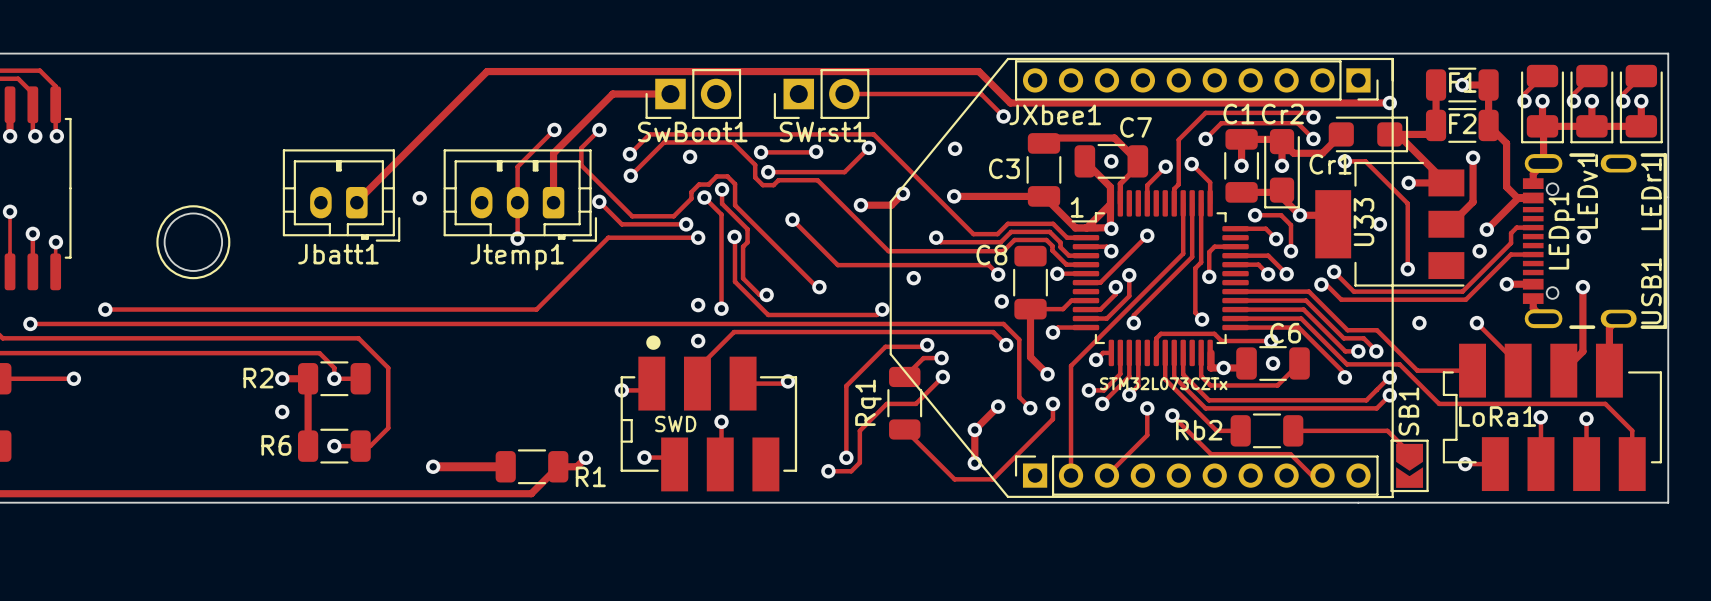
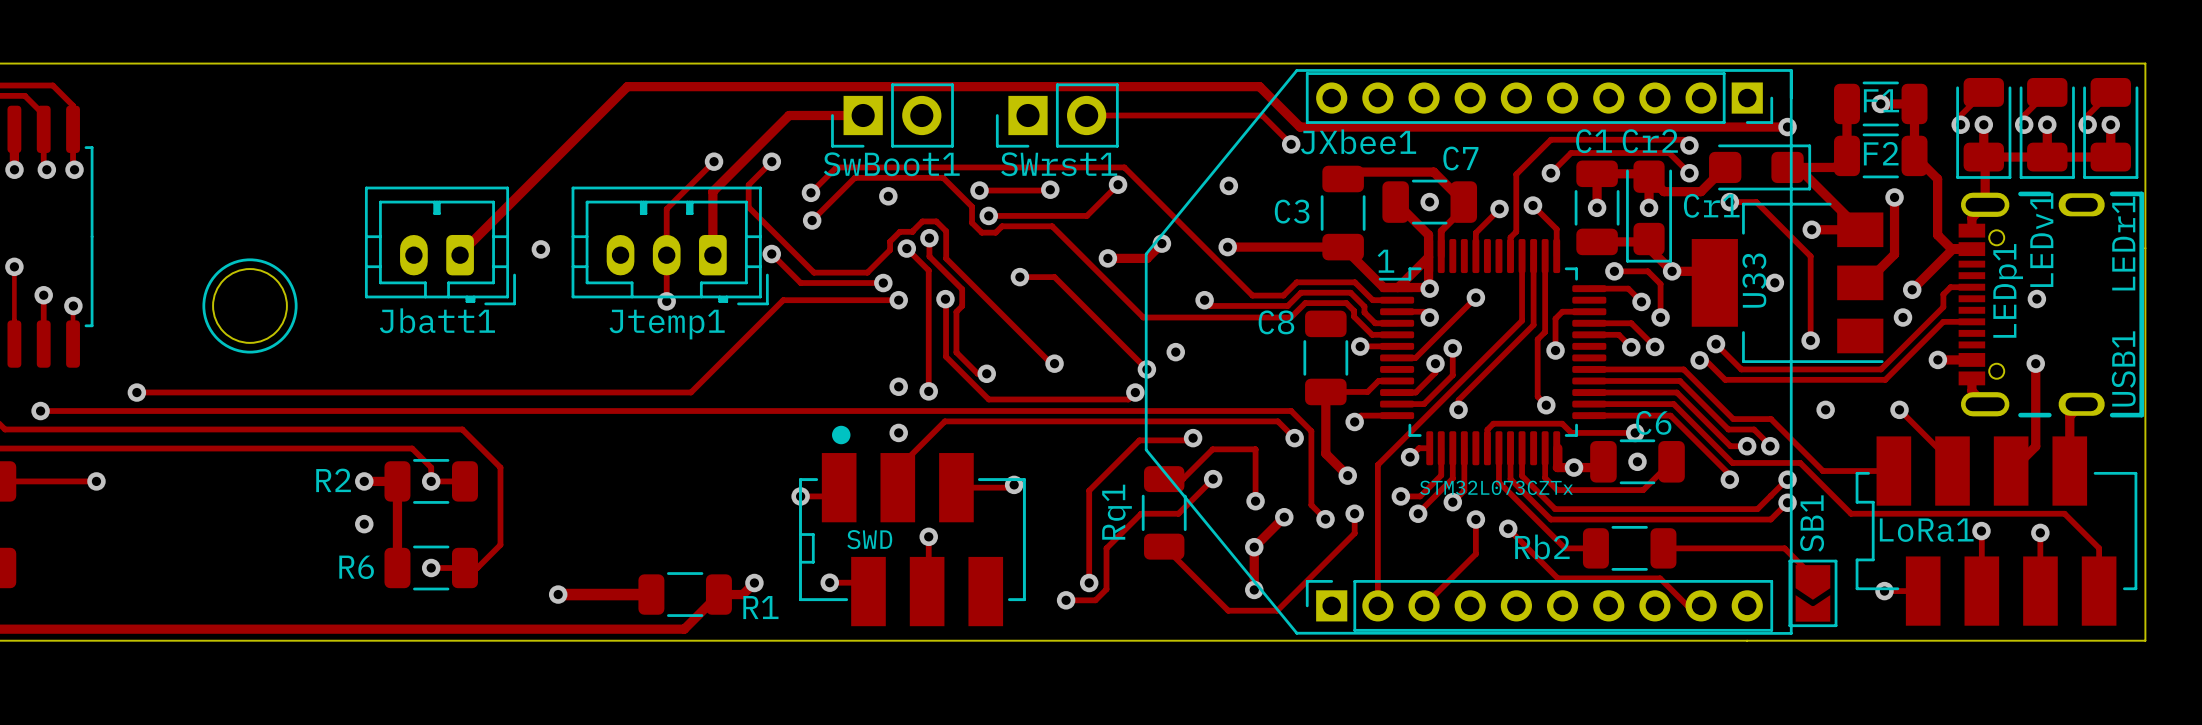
track: (792, 219) (837, 265) (988, 265) (998, 274) -> (1019, 277) (1054, 277) (1146, 369)
via: (998, 274) -> none
via: none -> (1146, 369)
via: (1001, 301) -> none
track: none -> (1255, 449) (1255, 501)
track: (941, 358) (923, 358) (904, 376) -> (1255, 449) (1212, 449) (1182, 479) (1164, 479)
via: (941, 358) -> none
via: none -> (1255, 501)

